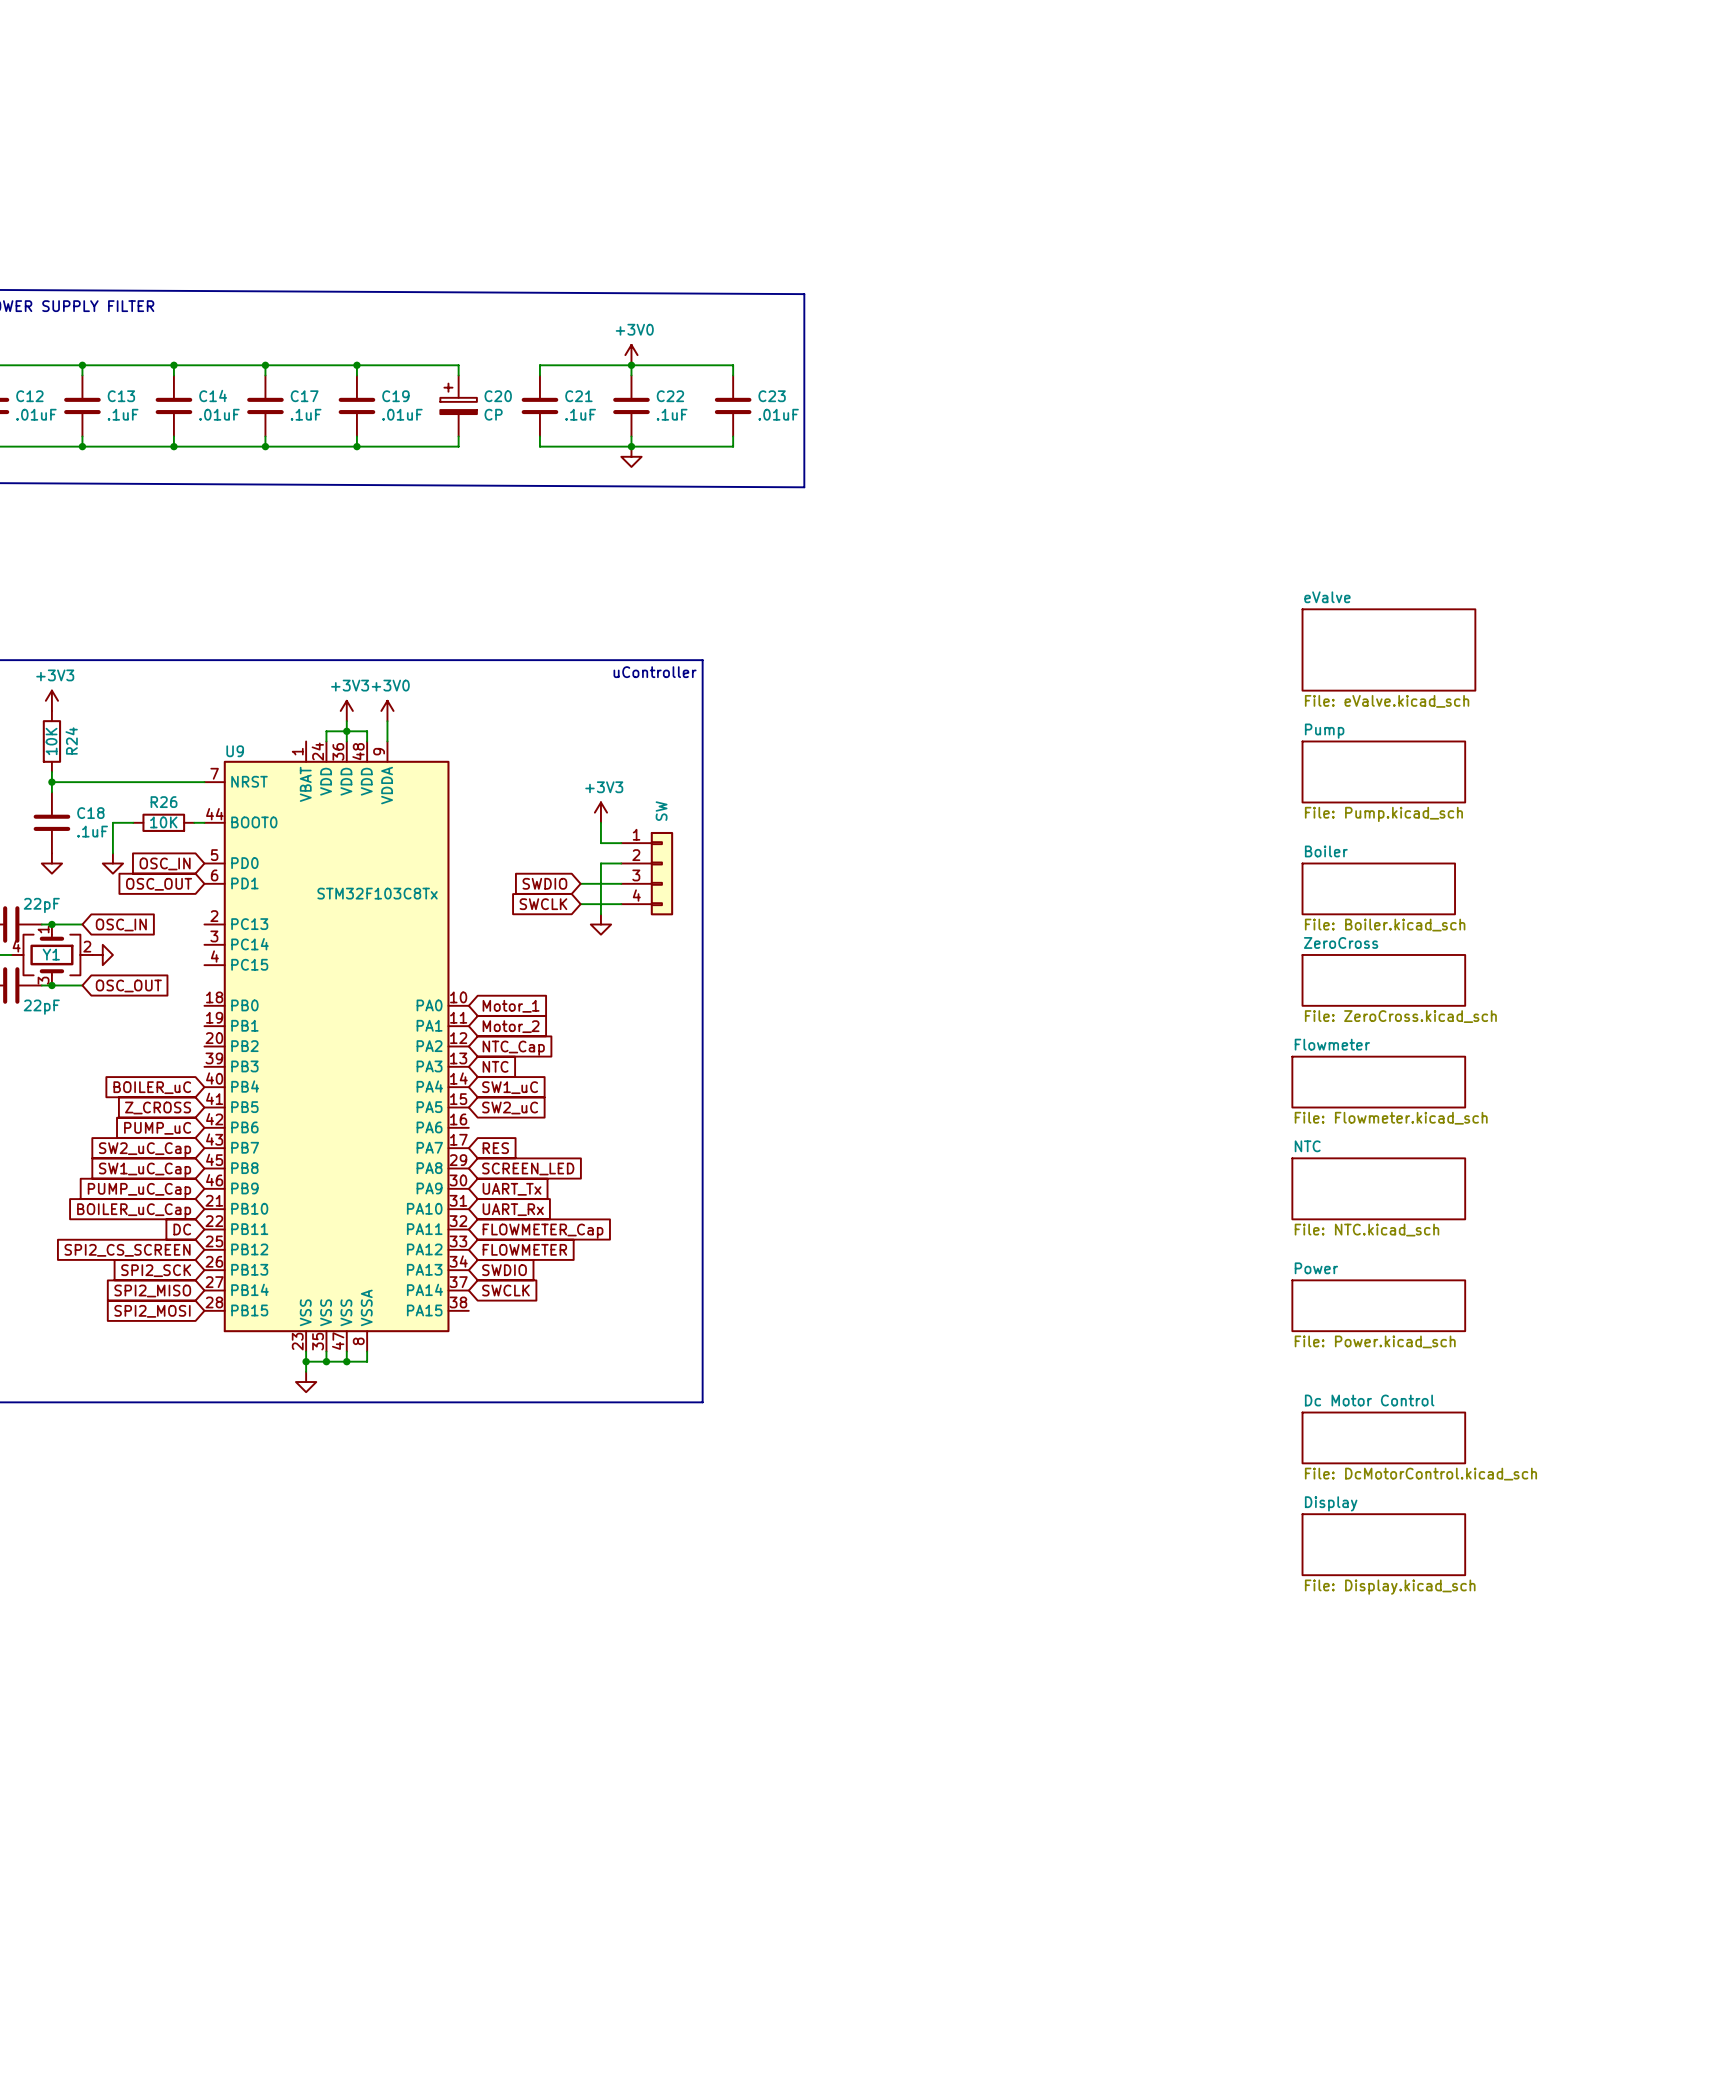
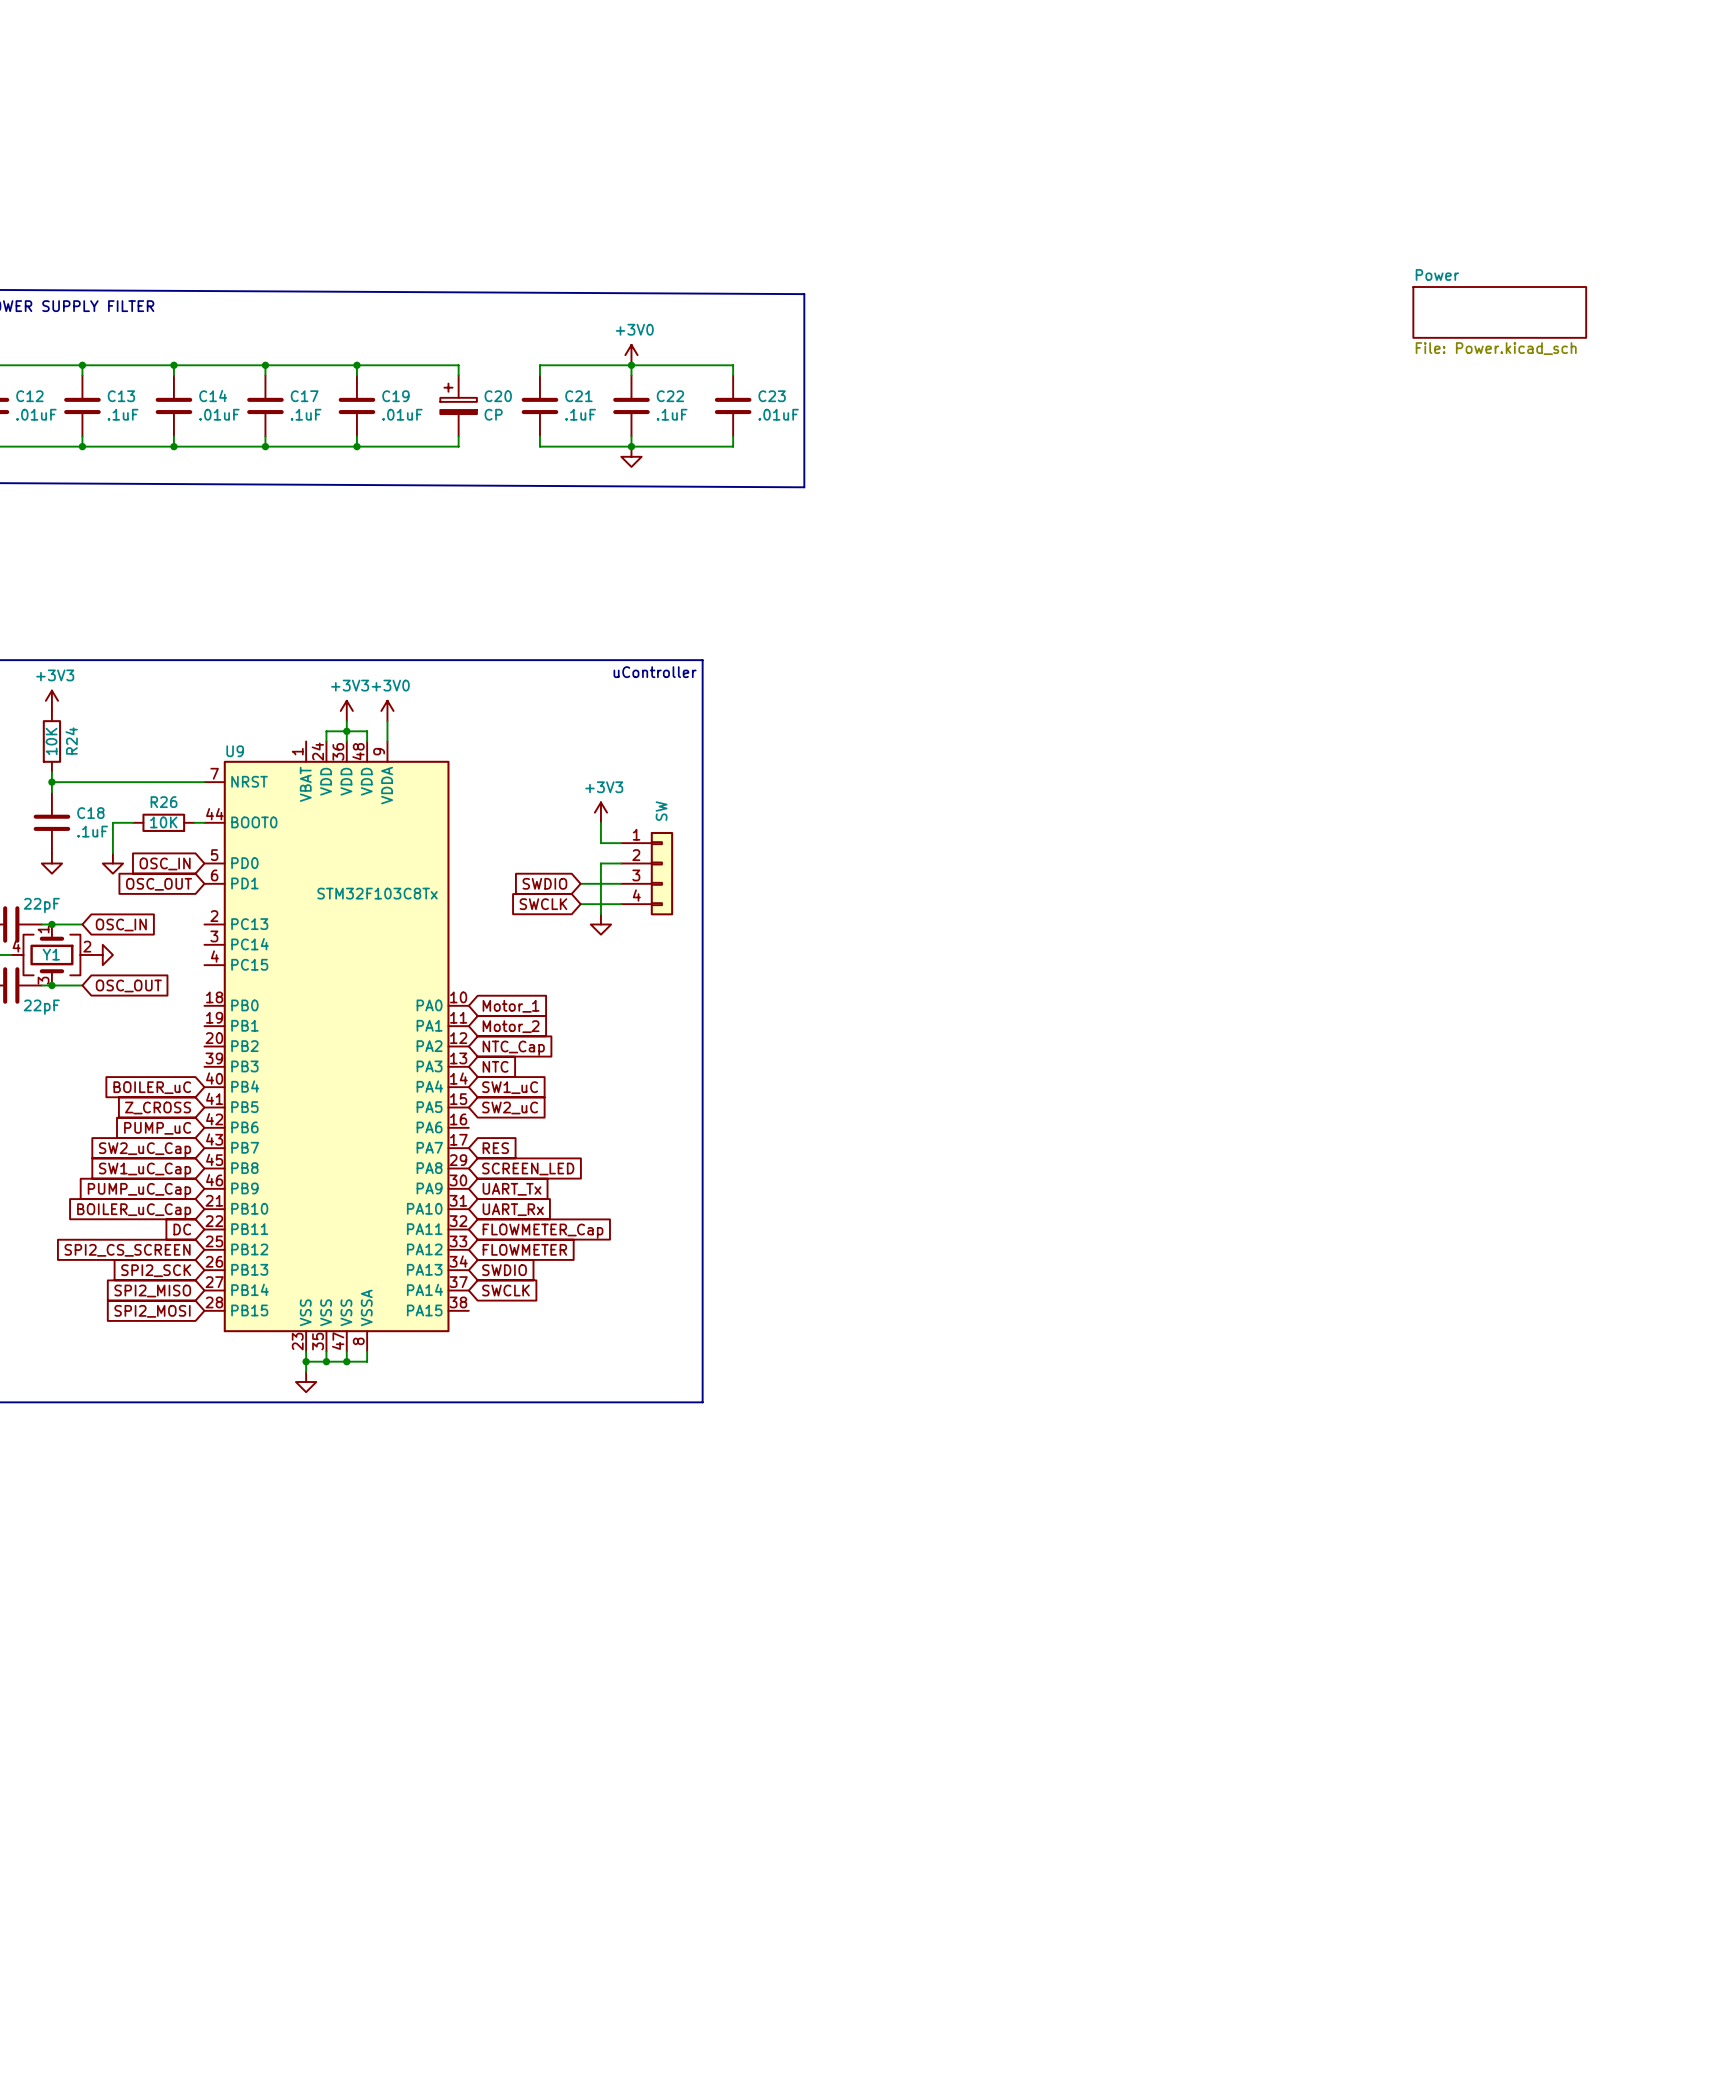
sheet Power: none -> File: Power.kicad_sch (1499, 312)
sheet eValve: File: eValve.kicad_sch (1388, 649) -> none
sheet Pump: File: Pump.kicad_sch (1383, 771) -> none
sheet Boiler: File: Boiler.kicad_sch (1378, 888) -> none
sheet ZeroCross: File: ZeroCross.kicad_sch (1383, 980) -> none
sheet Flowmeter: File: Flowmeter.kicad_sch (1378, 1082) -> none
sheet NTC: File: NTC.kicad_sch (1378, 1188) -> none
sheet Power: File: Power.kicad_sch (1378, 1305) -> none
sheet Dc Motor Control: File: DcMotorControl.kicad_sch (1383, 1437) -> none
sheet Display: File: Display.kicad_sch (1383, 1544) -> none

